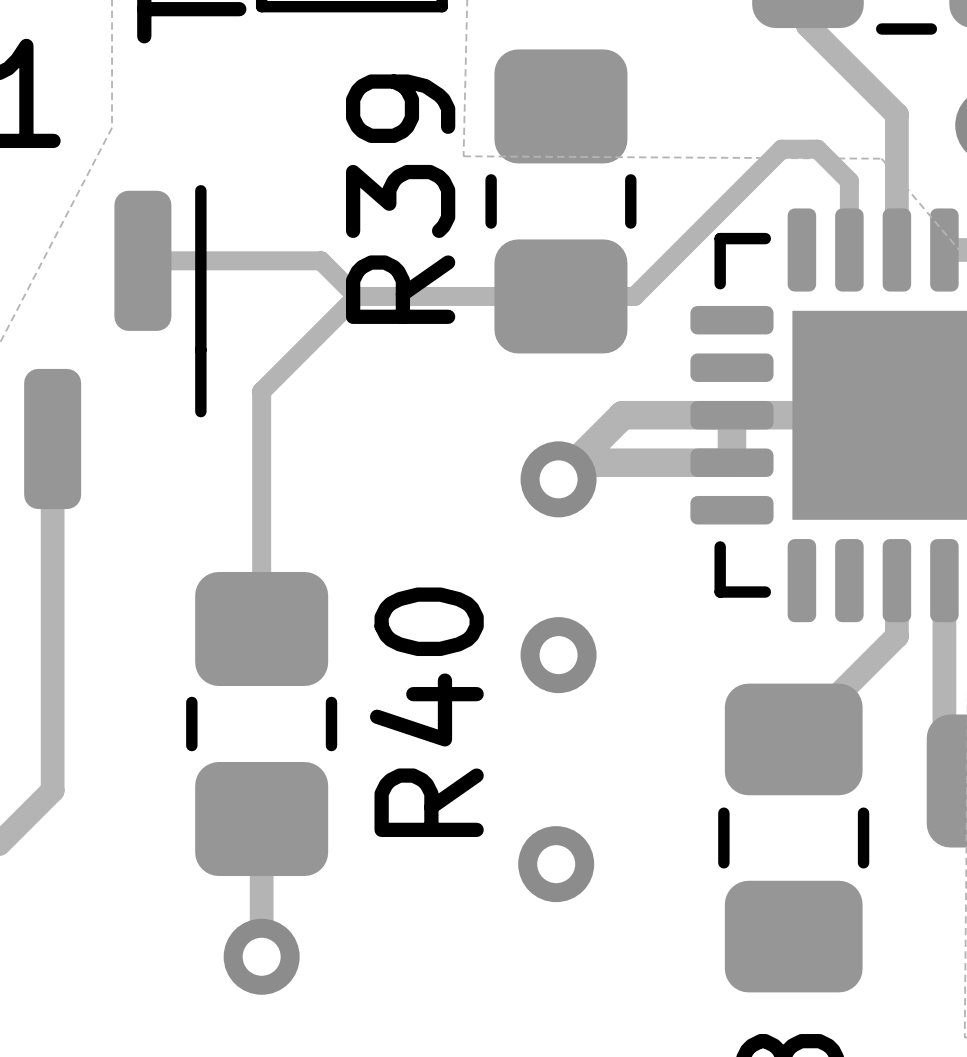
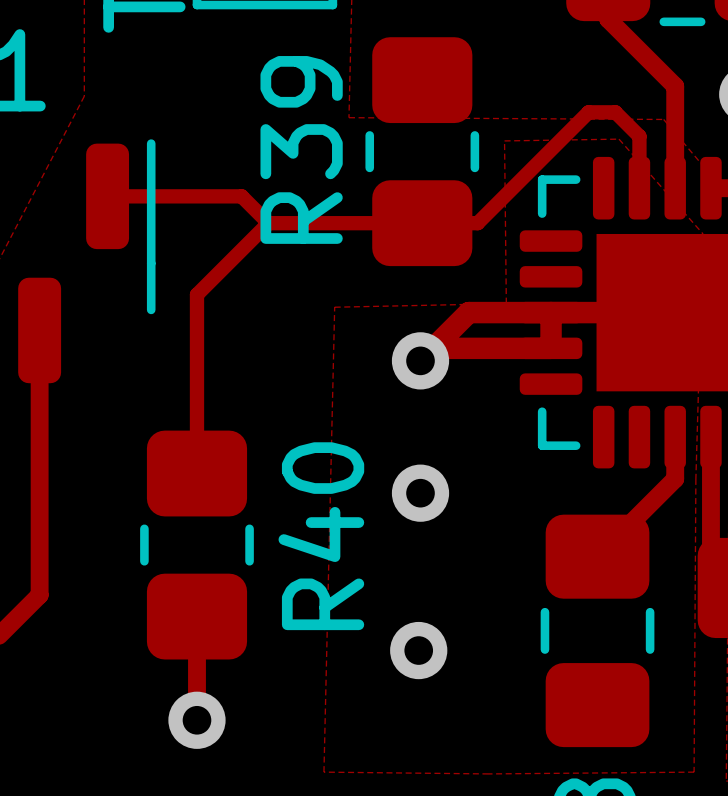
zone outline: none -> (618, 139) (504, 140) (506, 303) (334, 307) (323, 772) (488, 773) (694, 772) (695, 478) (703, 233) (618, 139)

